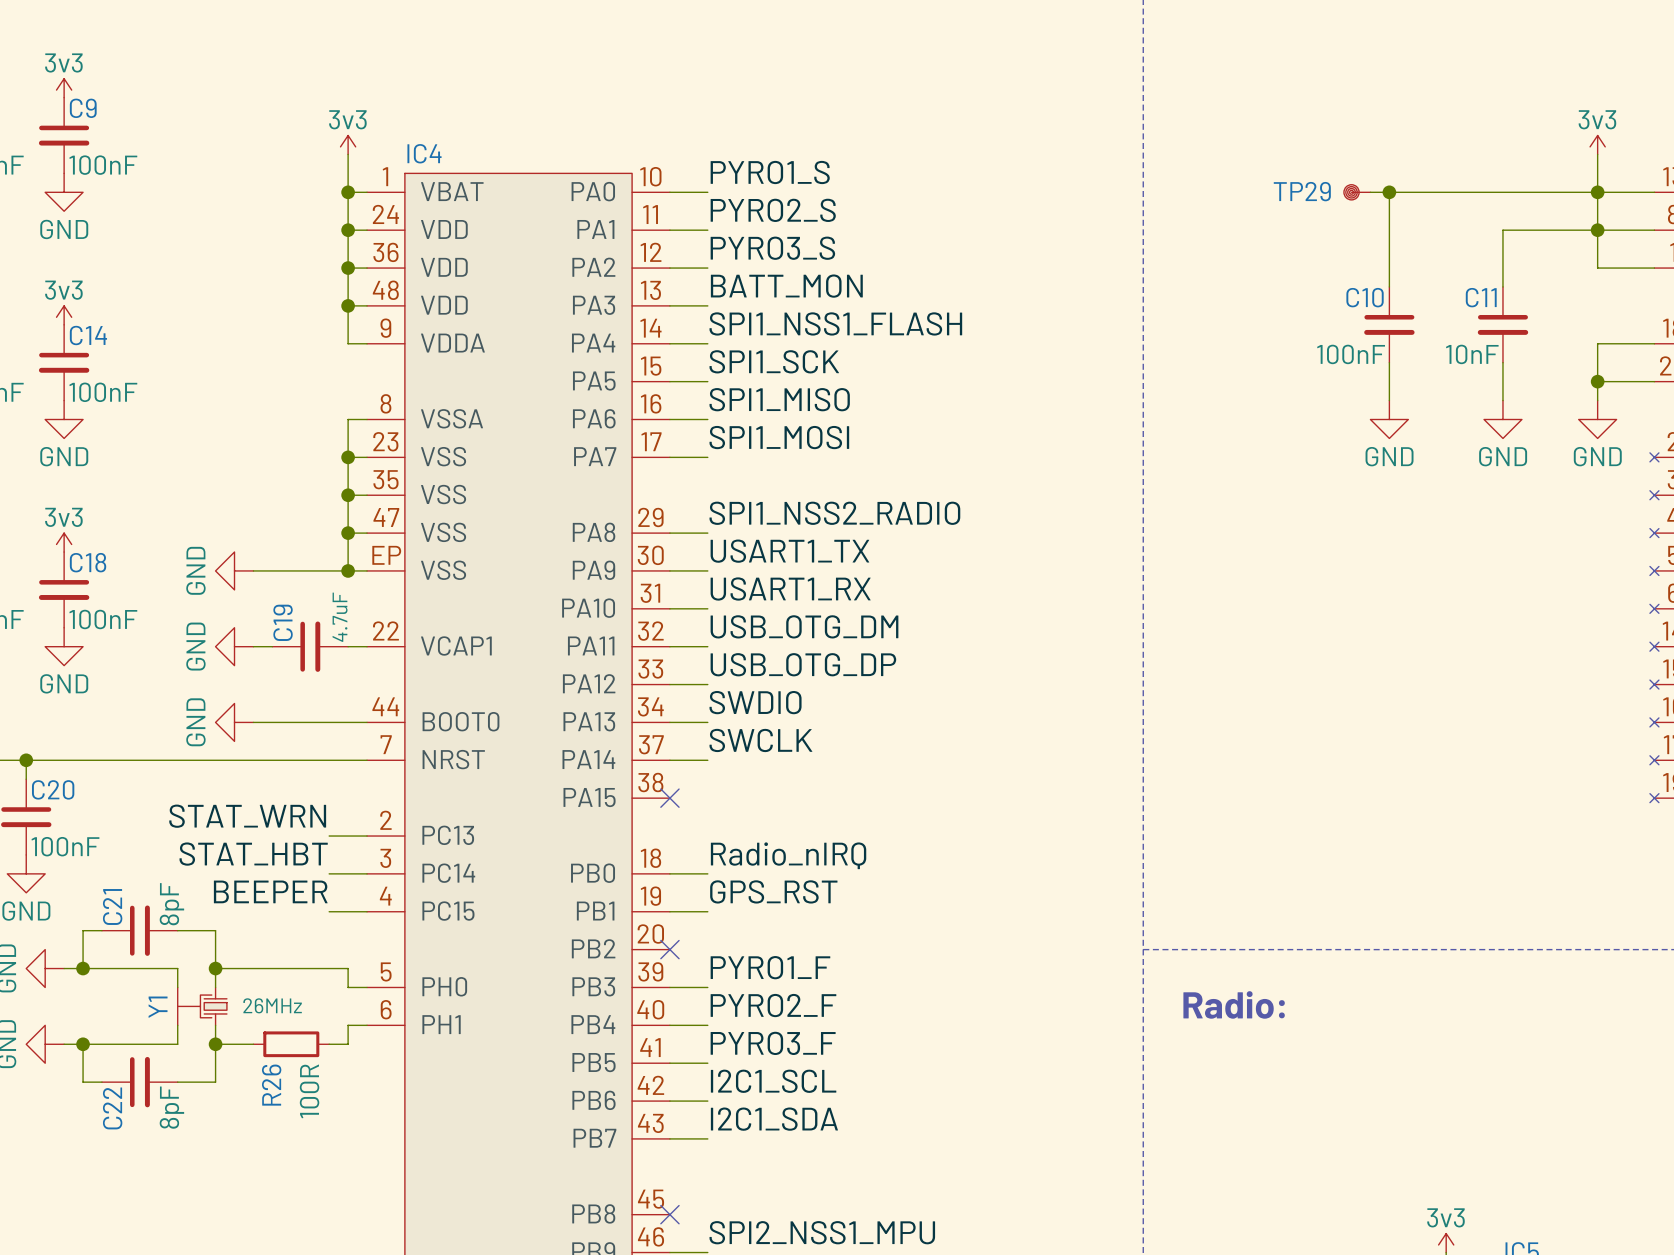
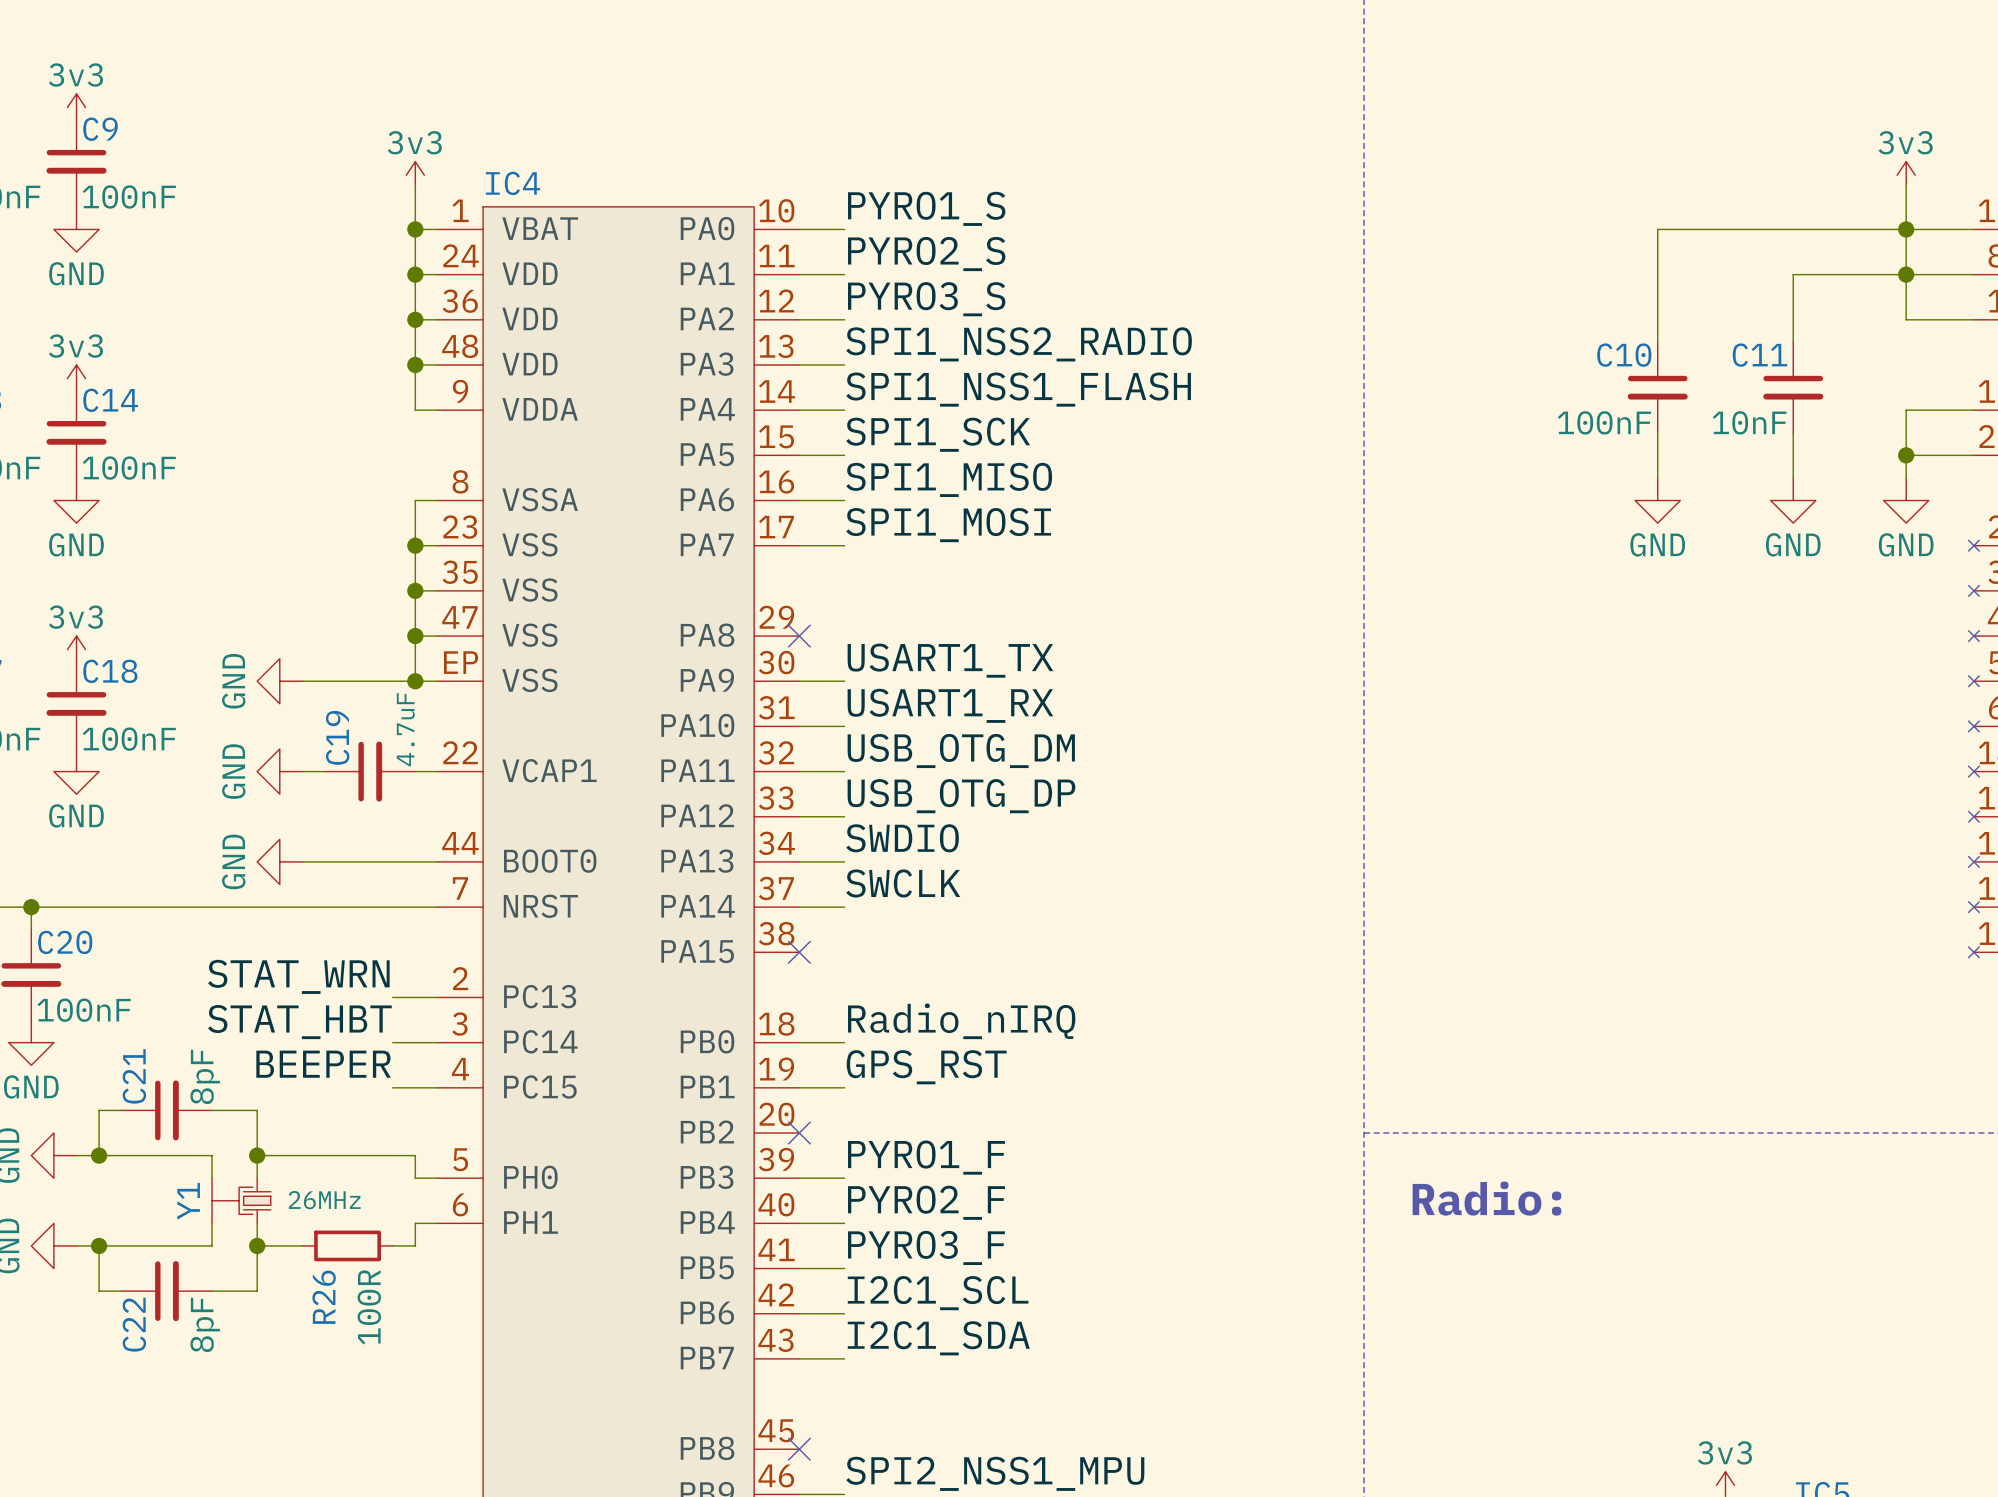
TP29: (1357, 192) -> none
wire: (1370, 192) (1389, 192) -> none
junction: (1389, 192) -> none
label: BATT_MON (786, 286) -> SPI1_NSS2_RADIO (1019, 344)
label: SPI1_NSS2_RADIO (834, 513) -> none
wire: (669, 533) (707, 533) -> none
no-connect mark: none -> (799, 636)

